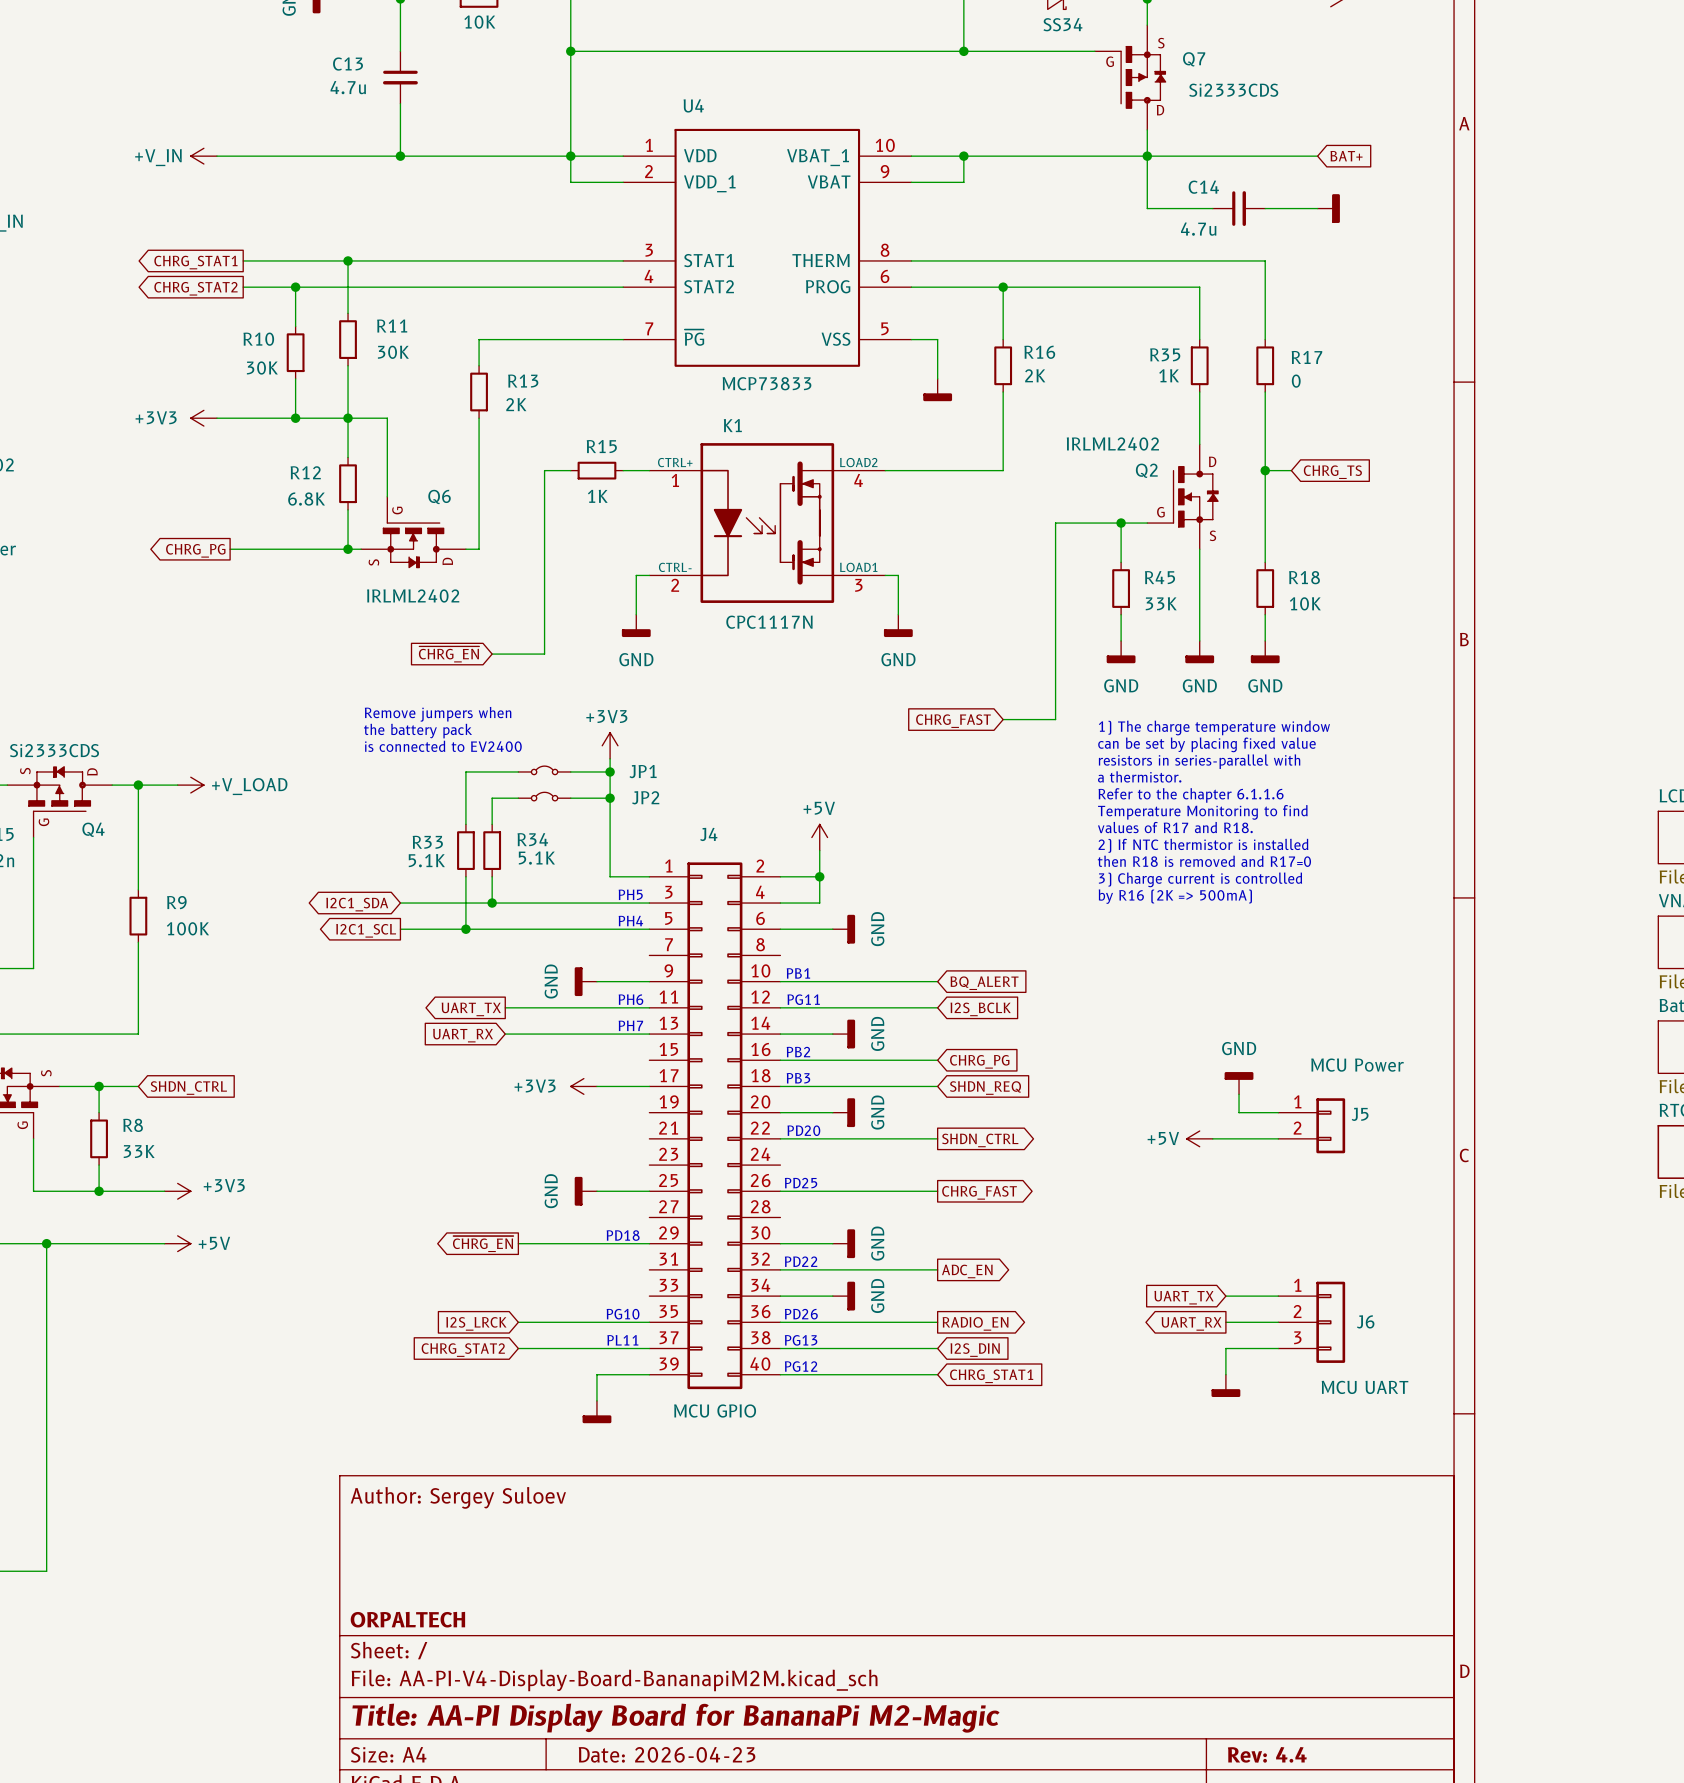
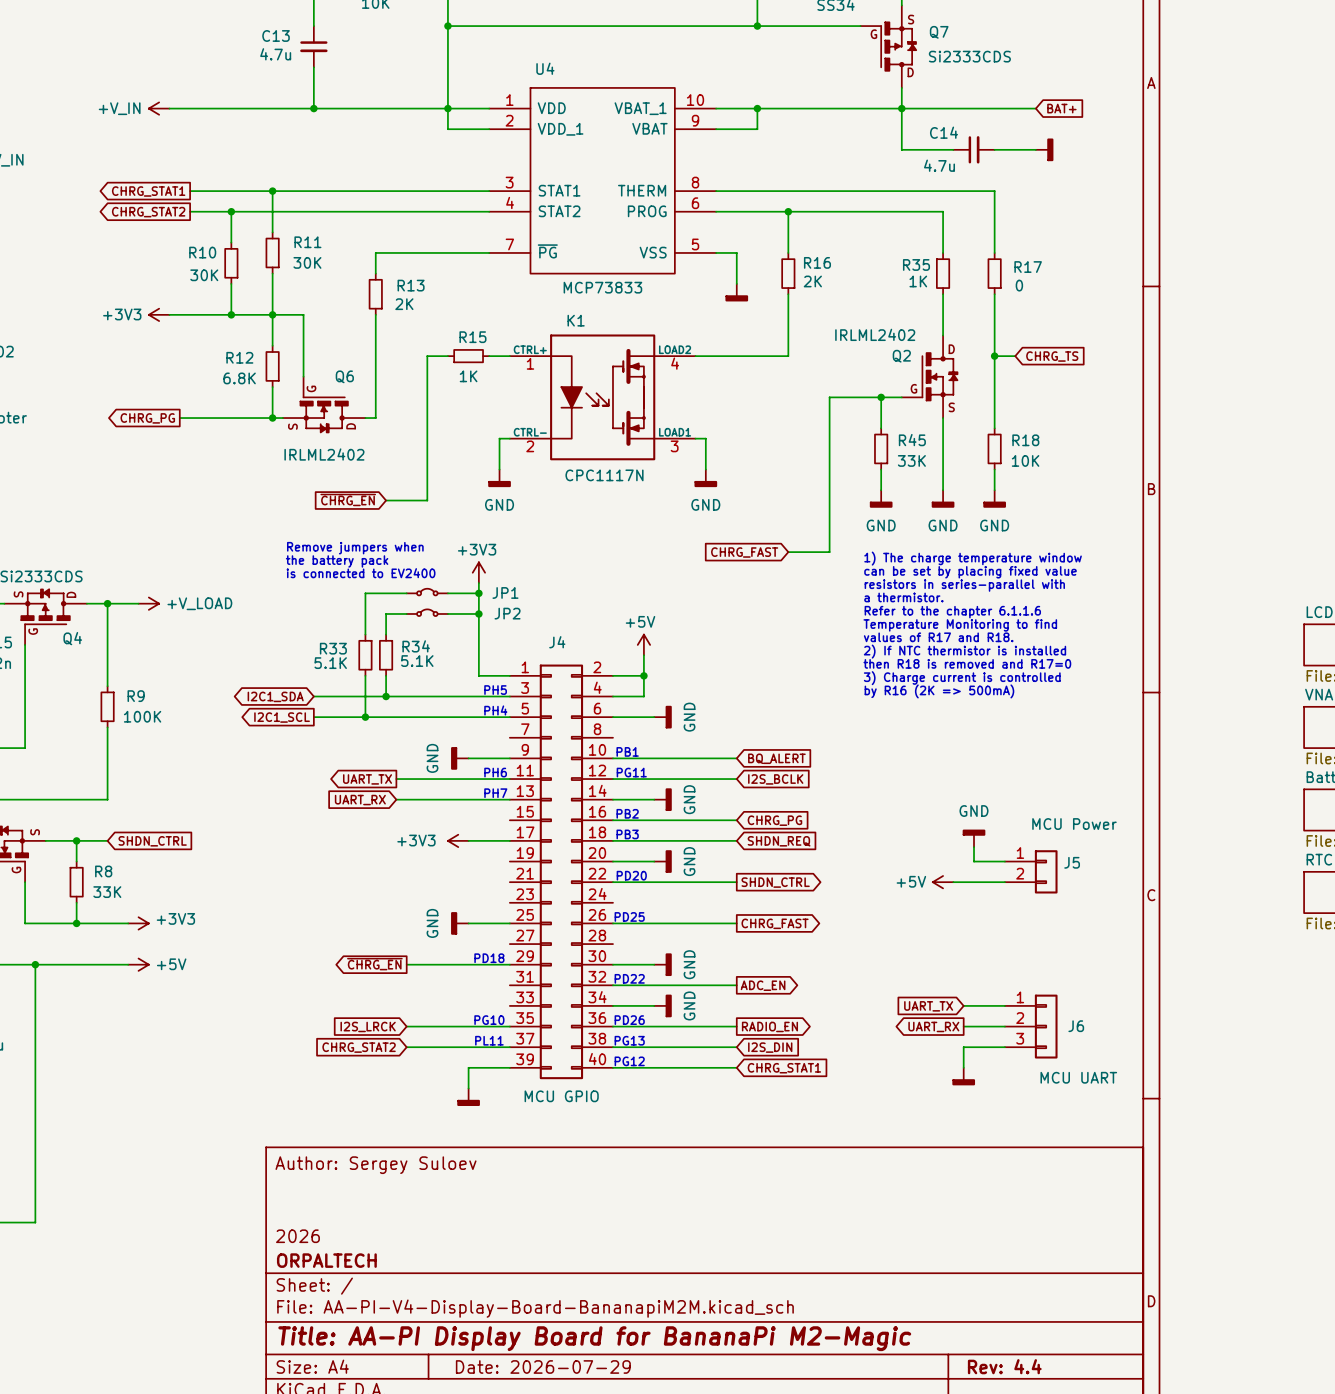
title block: none -> 2026 (297, 1236)
title block: Date: 2026-04-23 (667, 1754) -> Date: 2026-07-29 (543, 1366)

